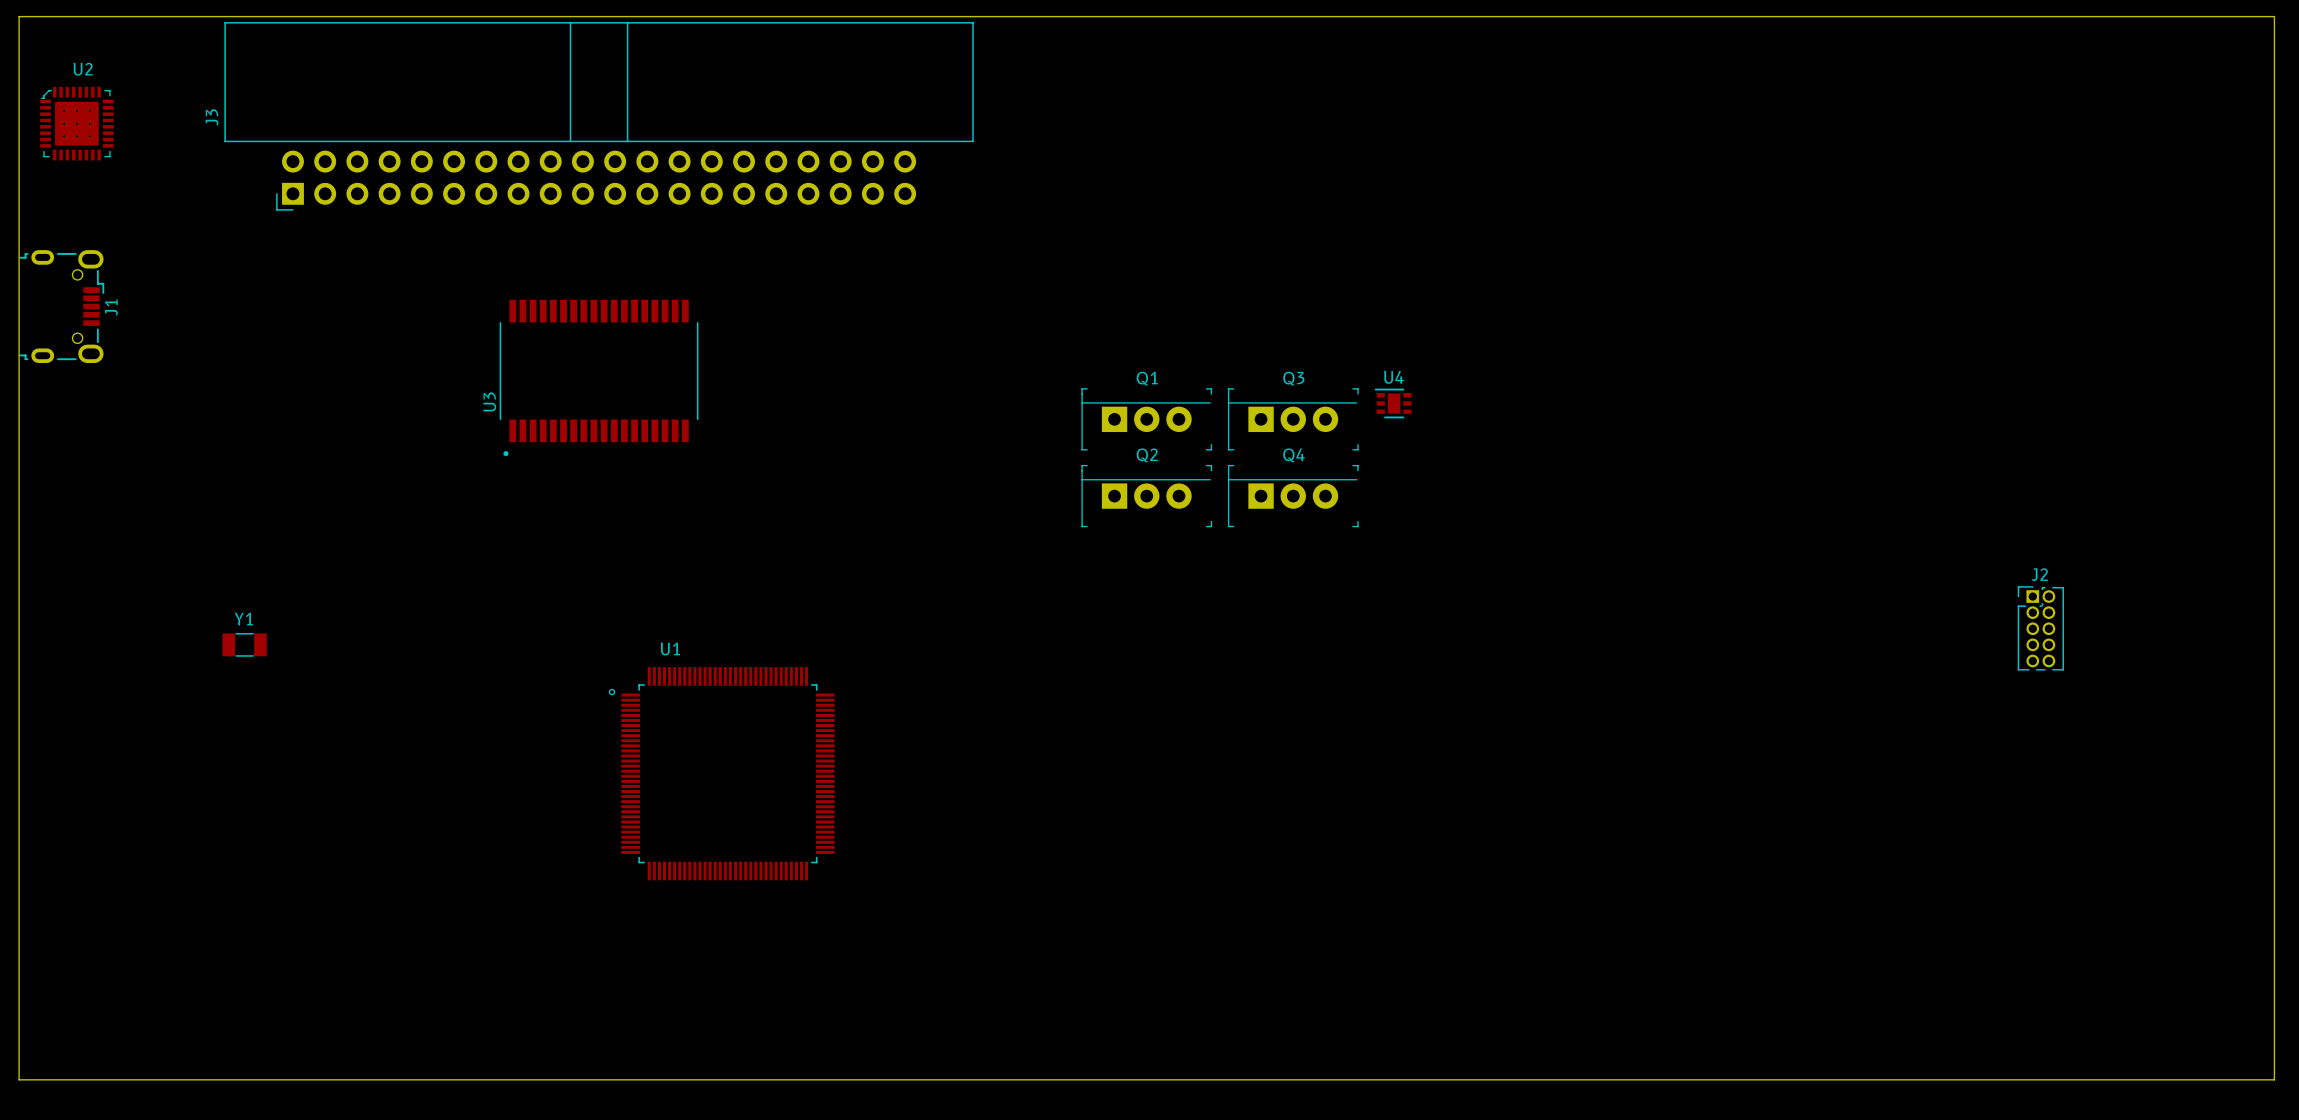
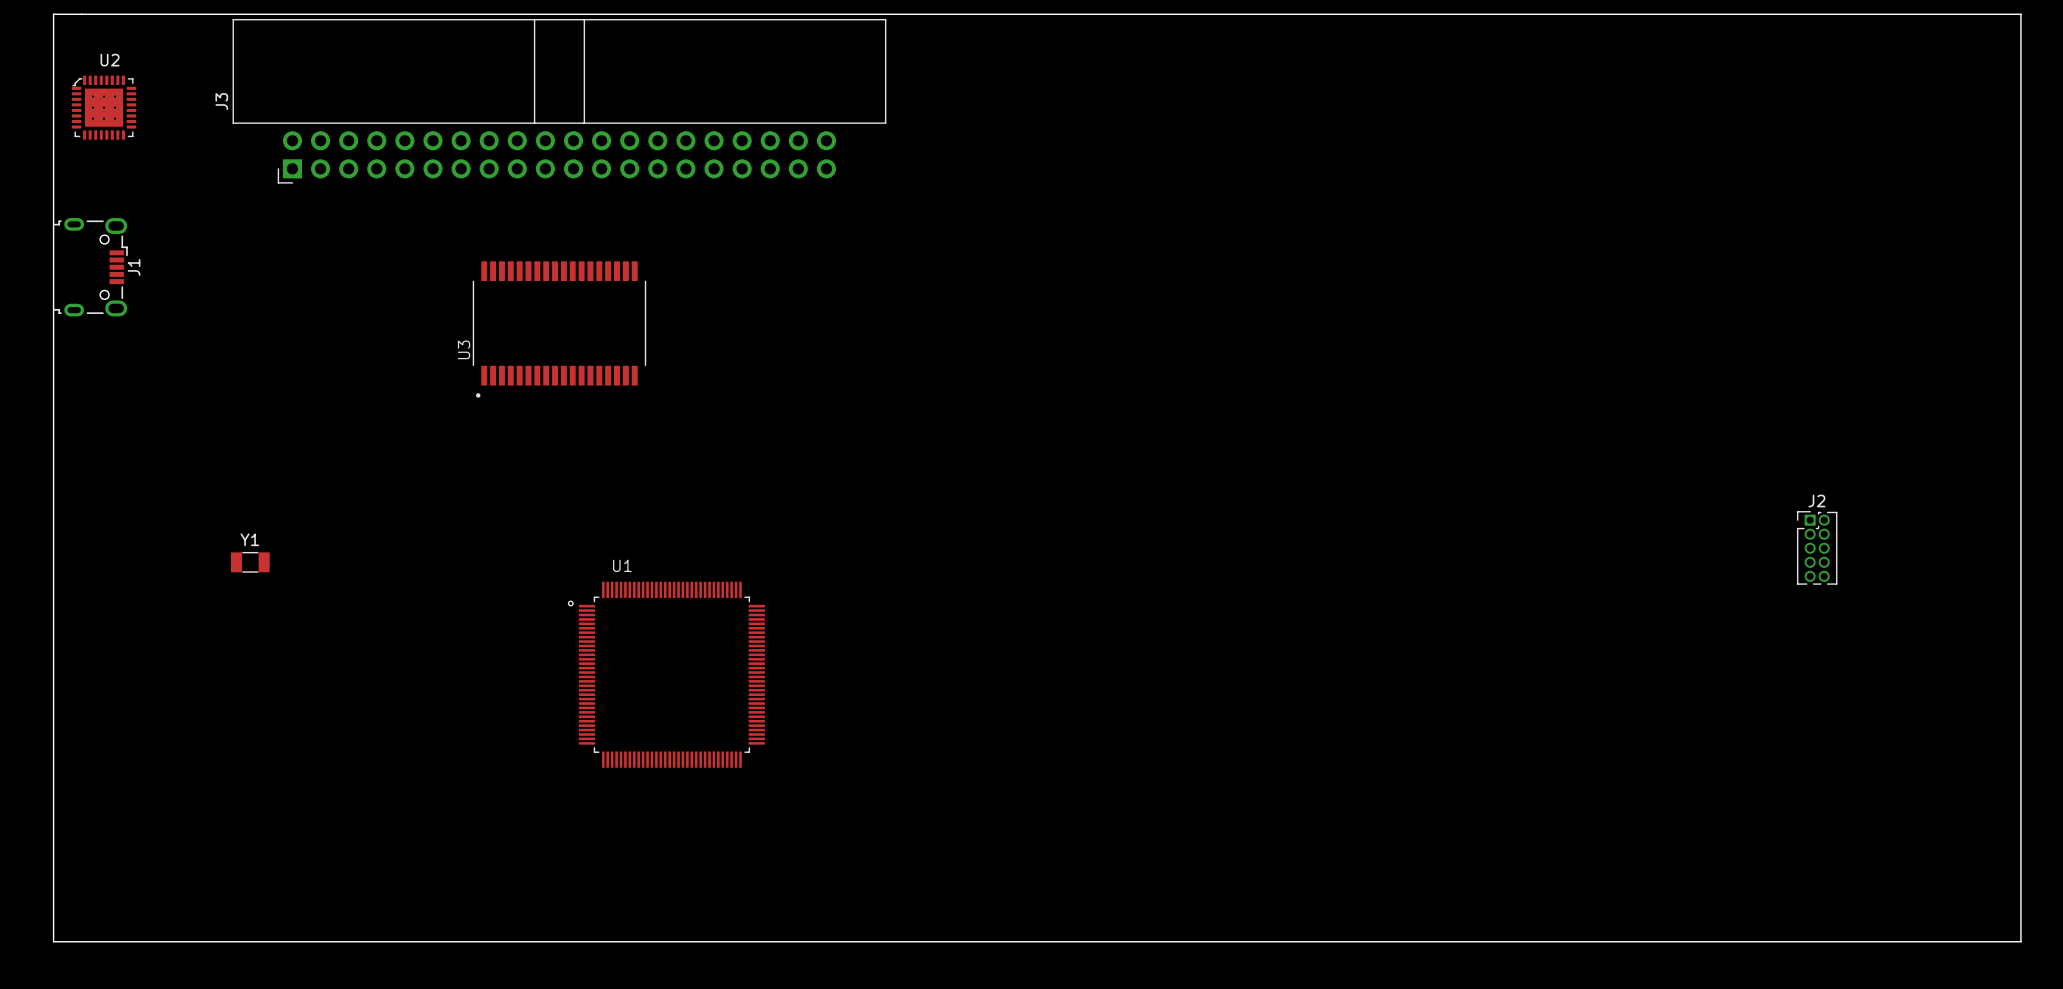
U4: (1393, 403) -> none
Q1: (1146, 419) -> none
Q3: (1293, 419) -> none
Q2: (1146, 496) -> none
Q4: (1293, 496) -> none

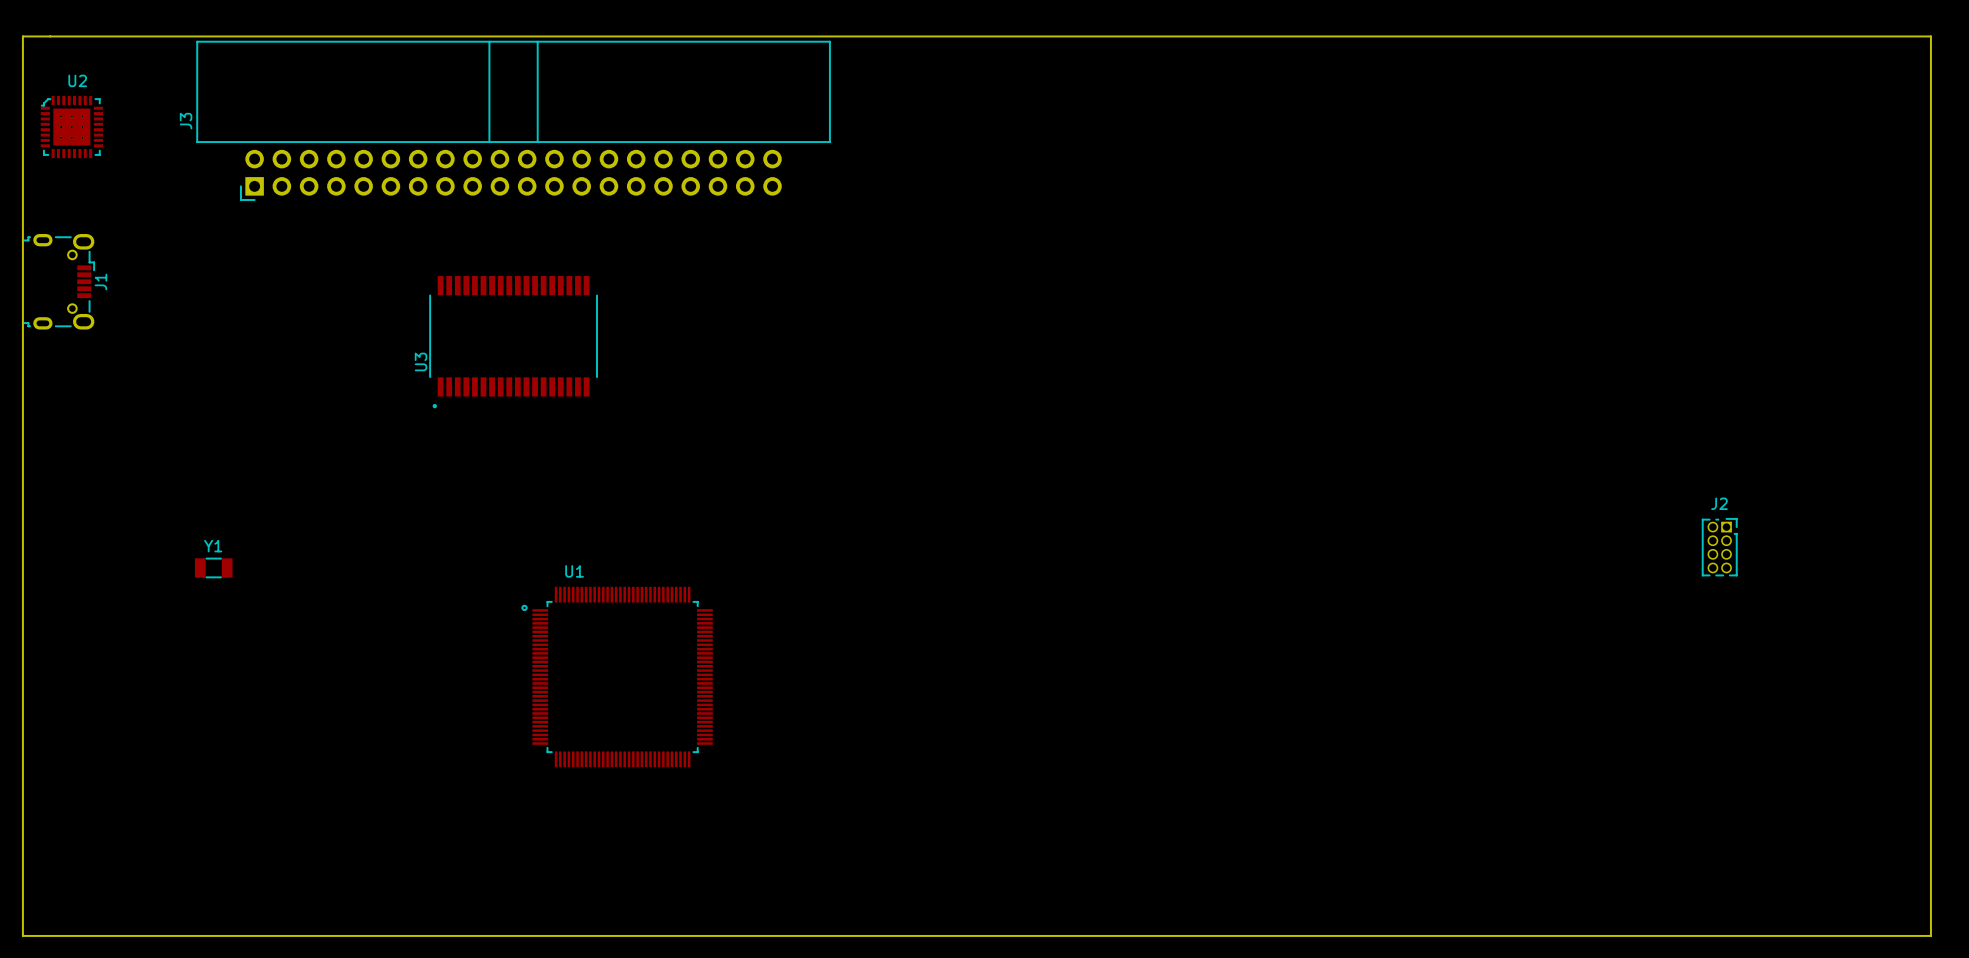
J2 footprint: [1797, 511, 1838, 585] -> [1702, 518, 1738, 577]

